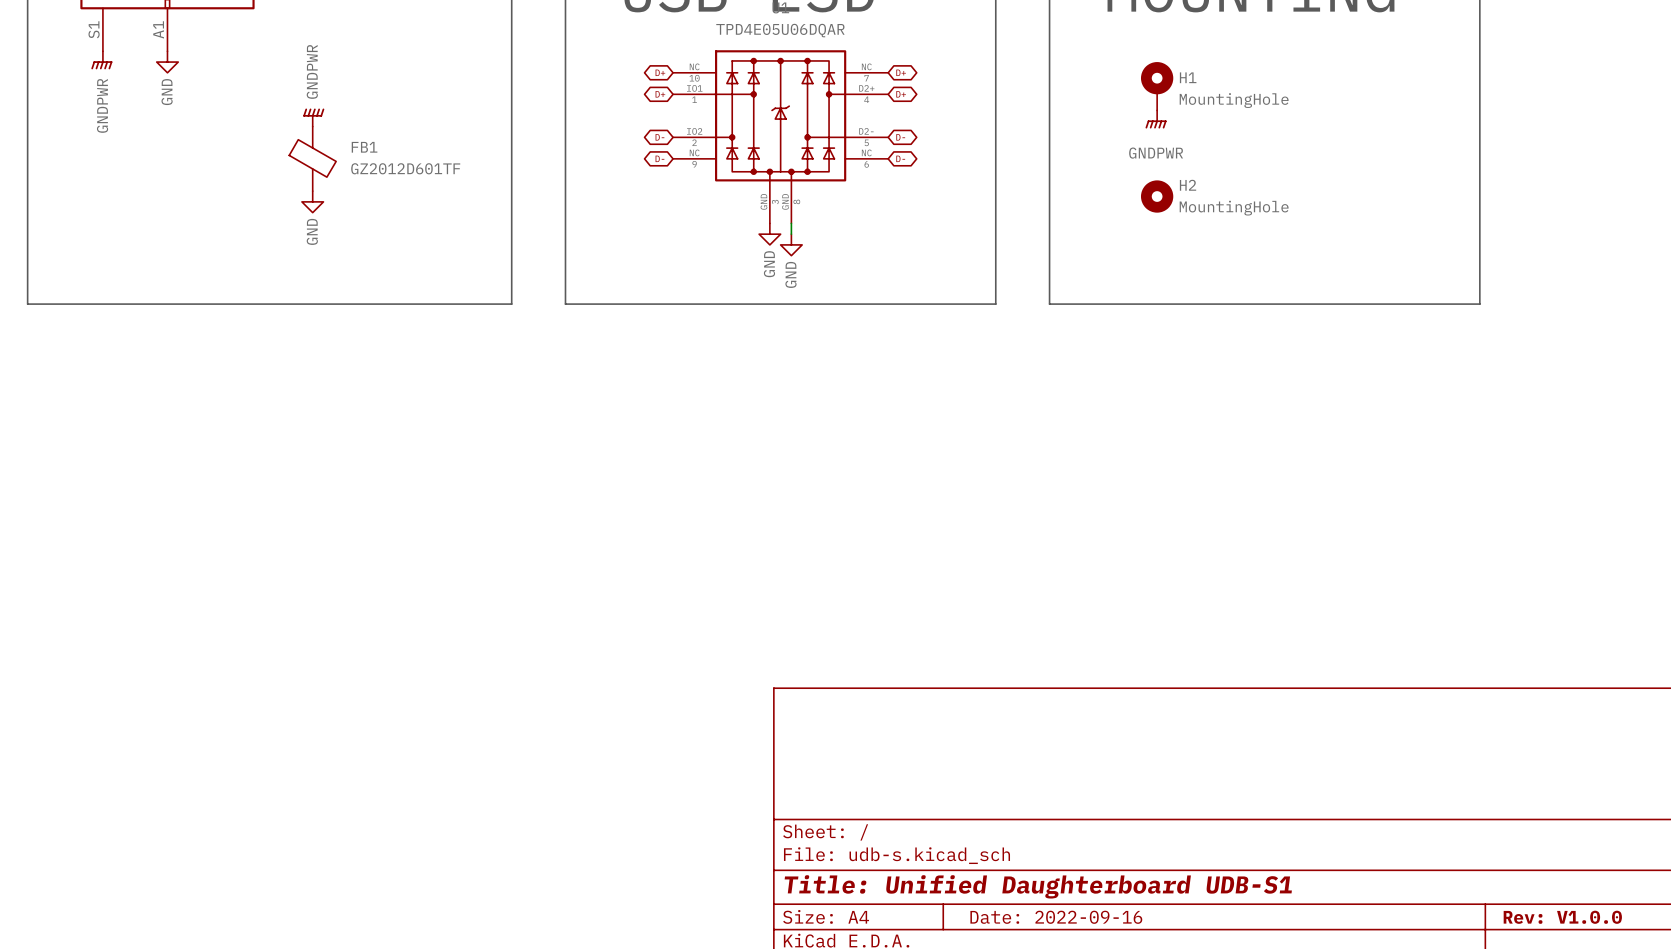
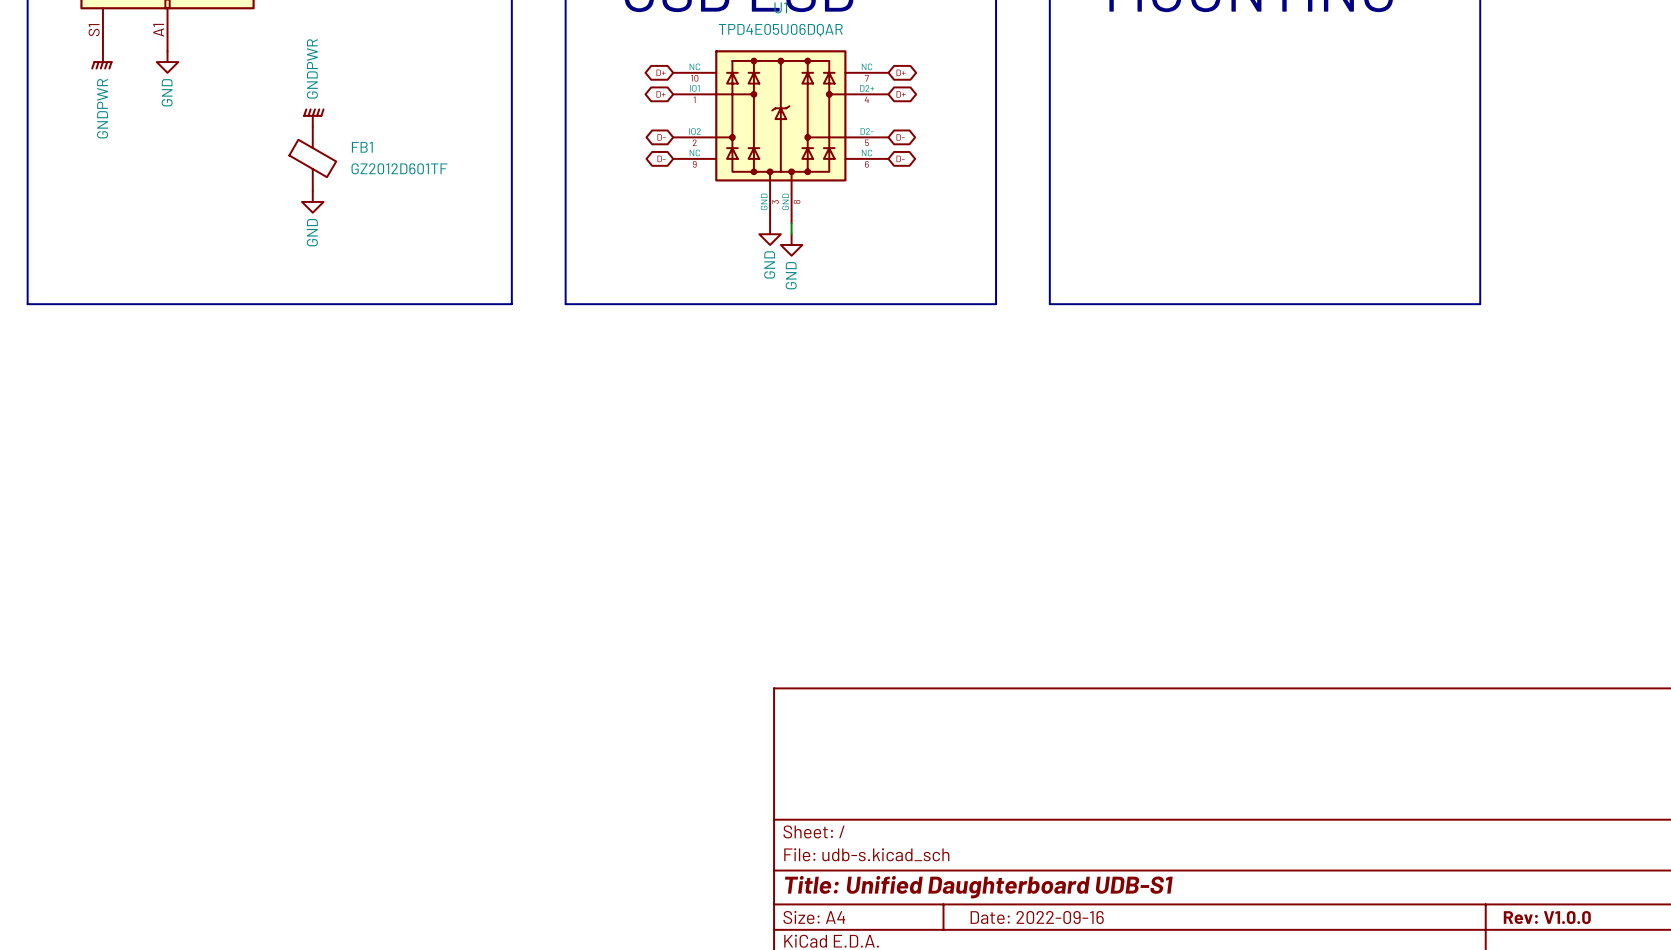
H1: MountingHole (1157, 86) -> none
power symbol: GNDPWR (1156, 119) -> none
H2: MountingHole (1157, 196) -> none

